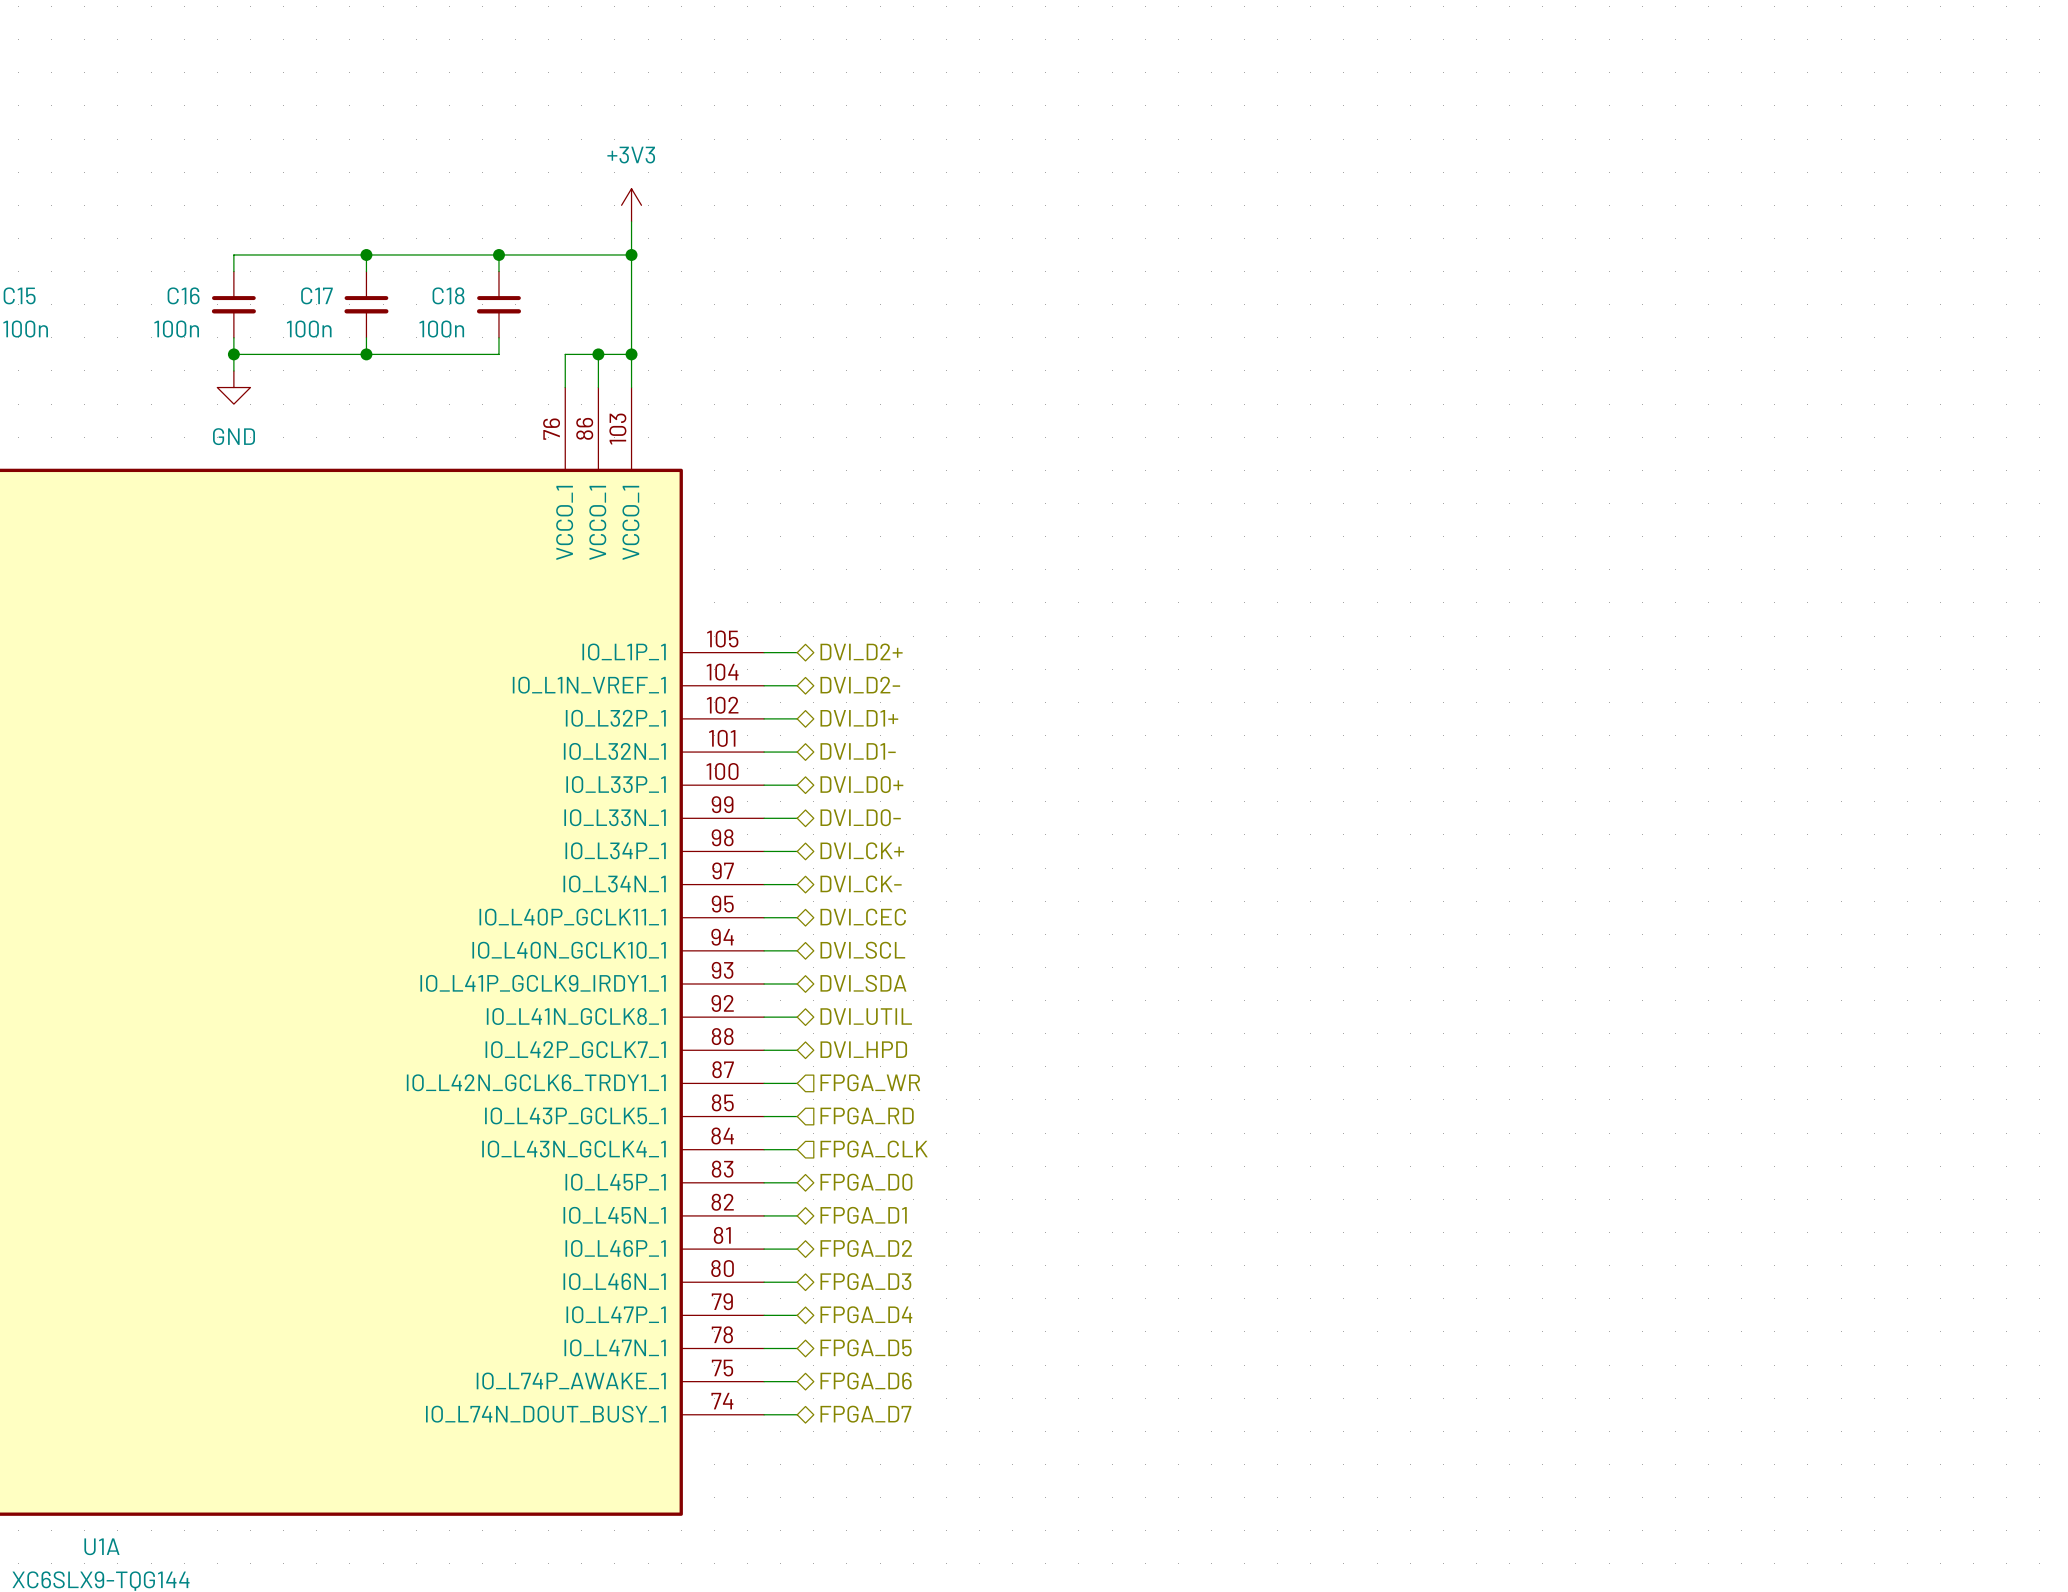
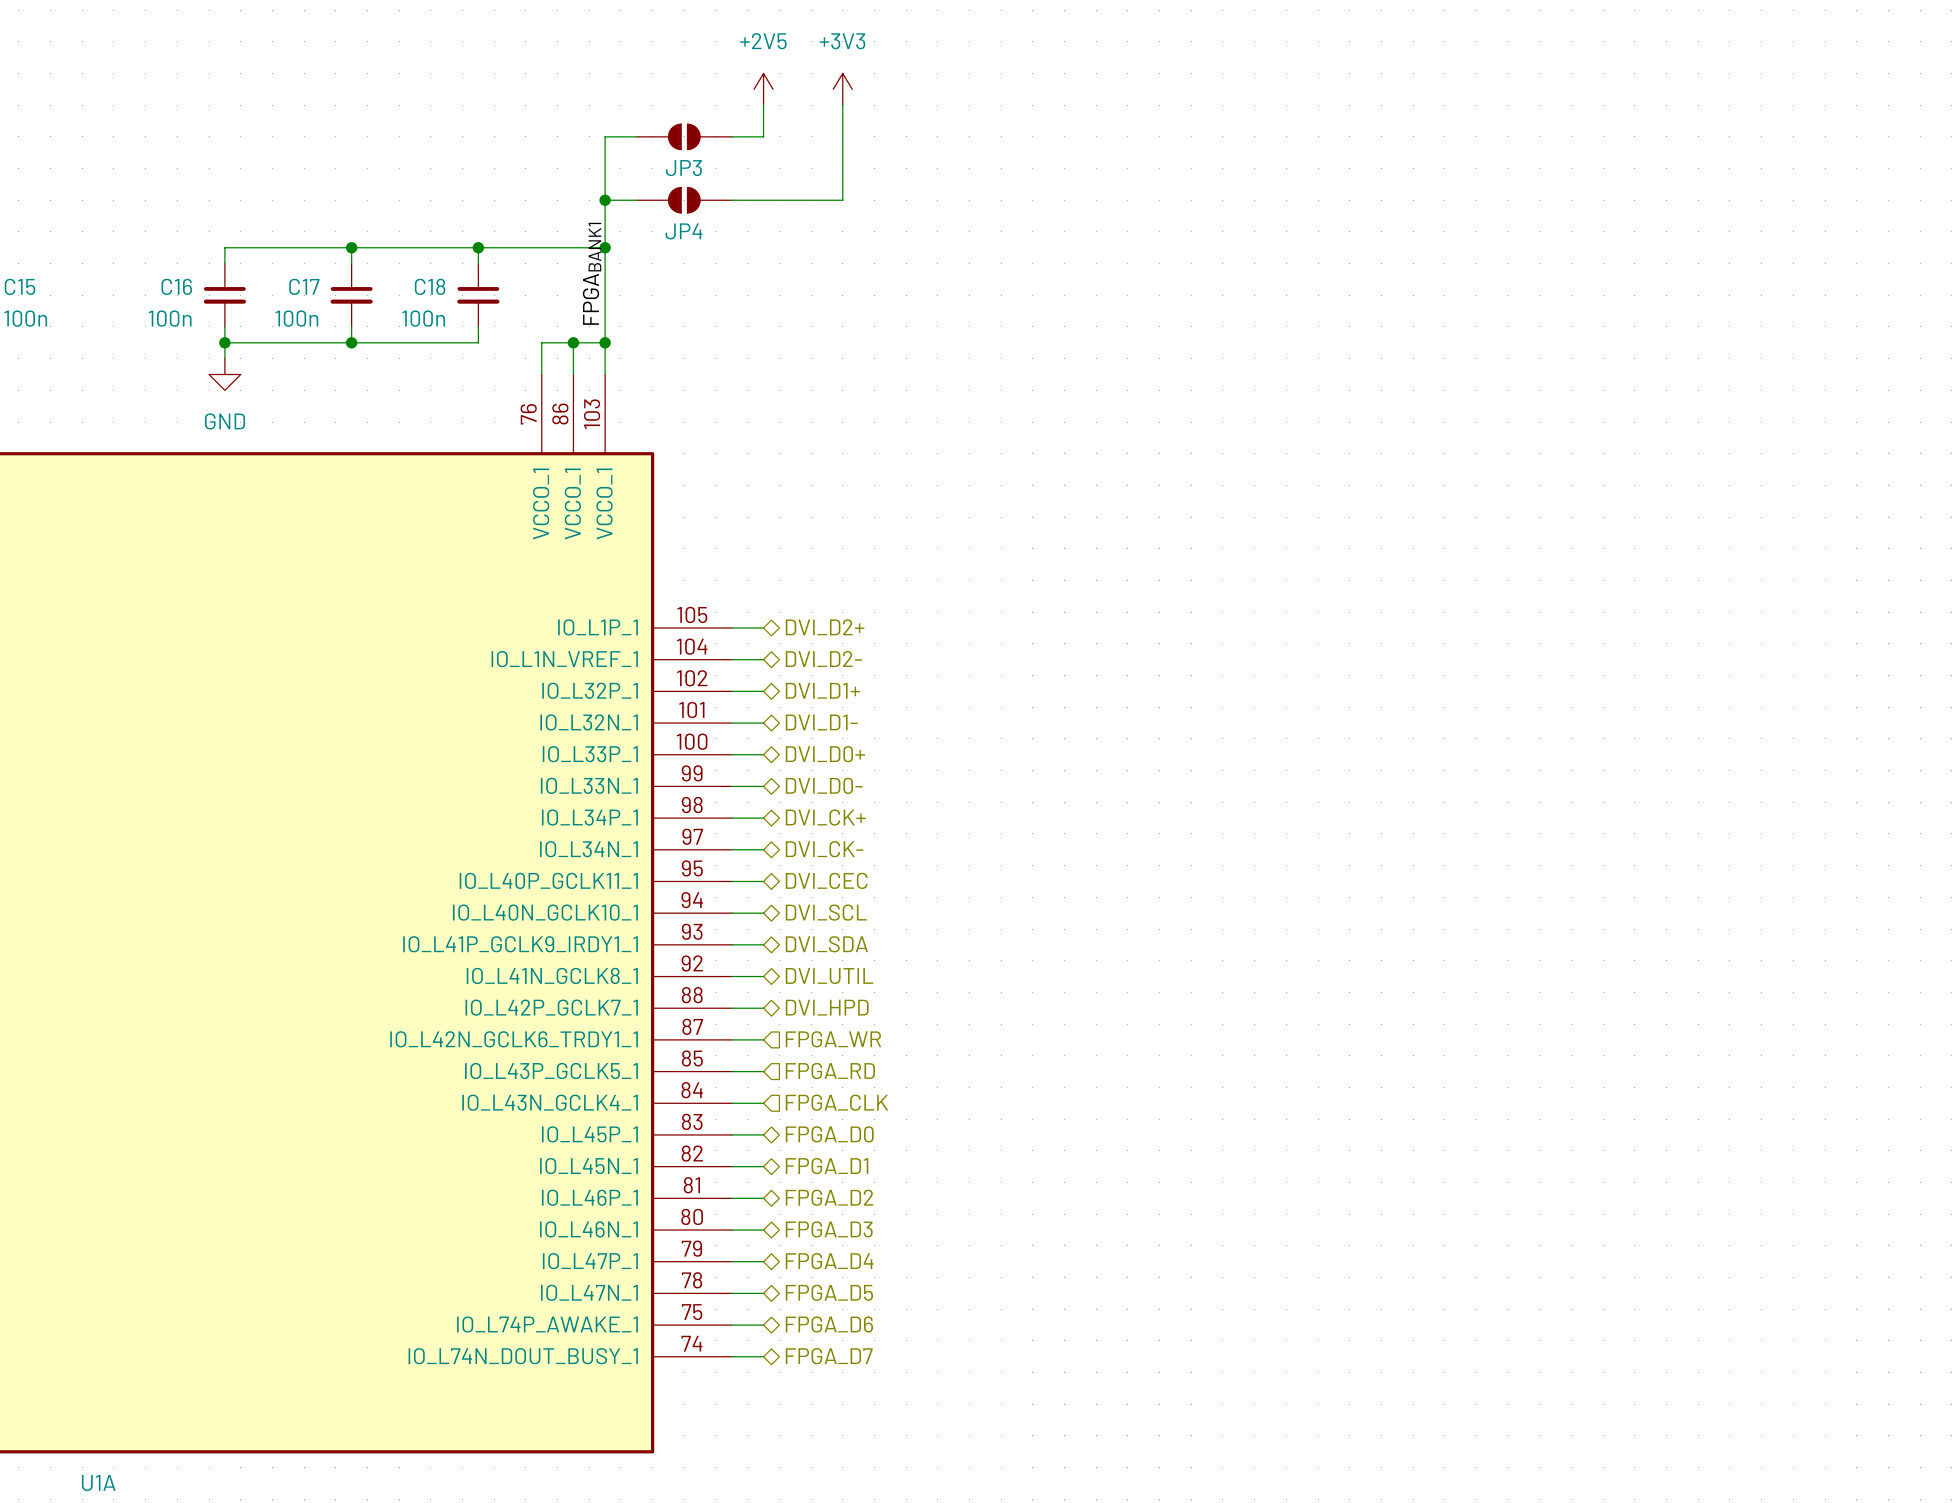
power symbol: none -> +2V5 (763, 89)
wire: none -> (763, 105) (763, 136) (731, 136)
wire: none -> (842, 105) (842, 200) (731, 200)
wire: none -> (636, 136) (605, 136) (605, 216)
JP3: none -> (684, 136)
wire: none -> (605, 200) (636, 200)
power symbol position: +3V3 (631, 205) -> +3V3 (842, 89)
junction: none -> (605, 200)
JP4: none -> (684, 200)
label: none -> FPGABANK1 (592, 273)

